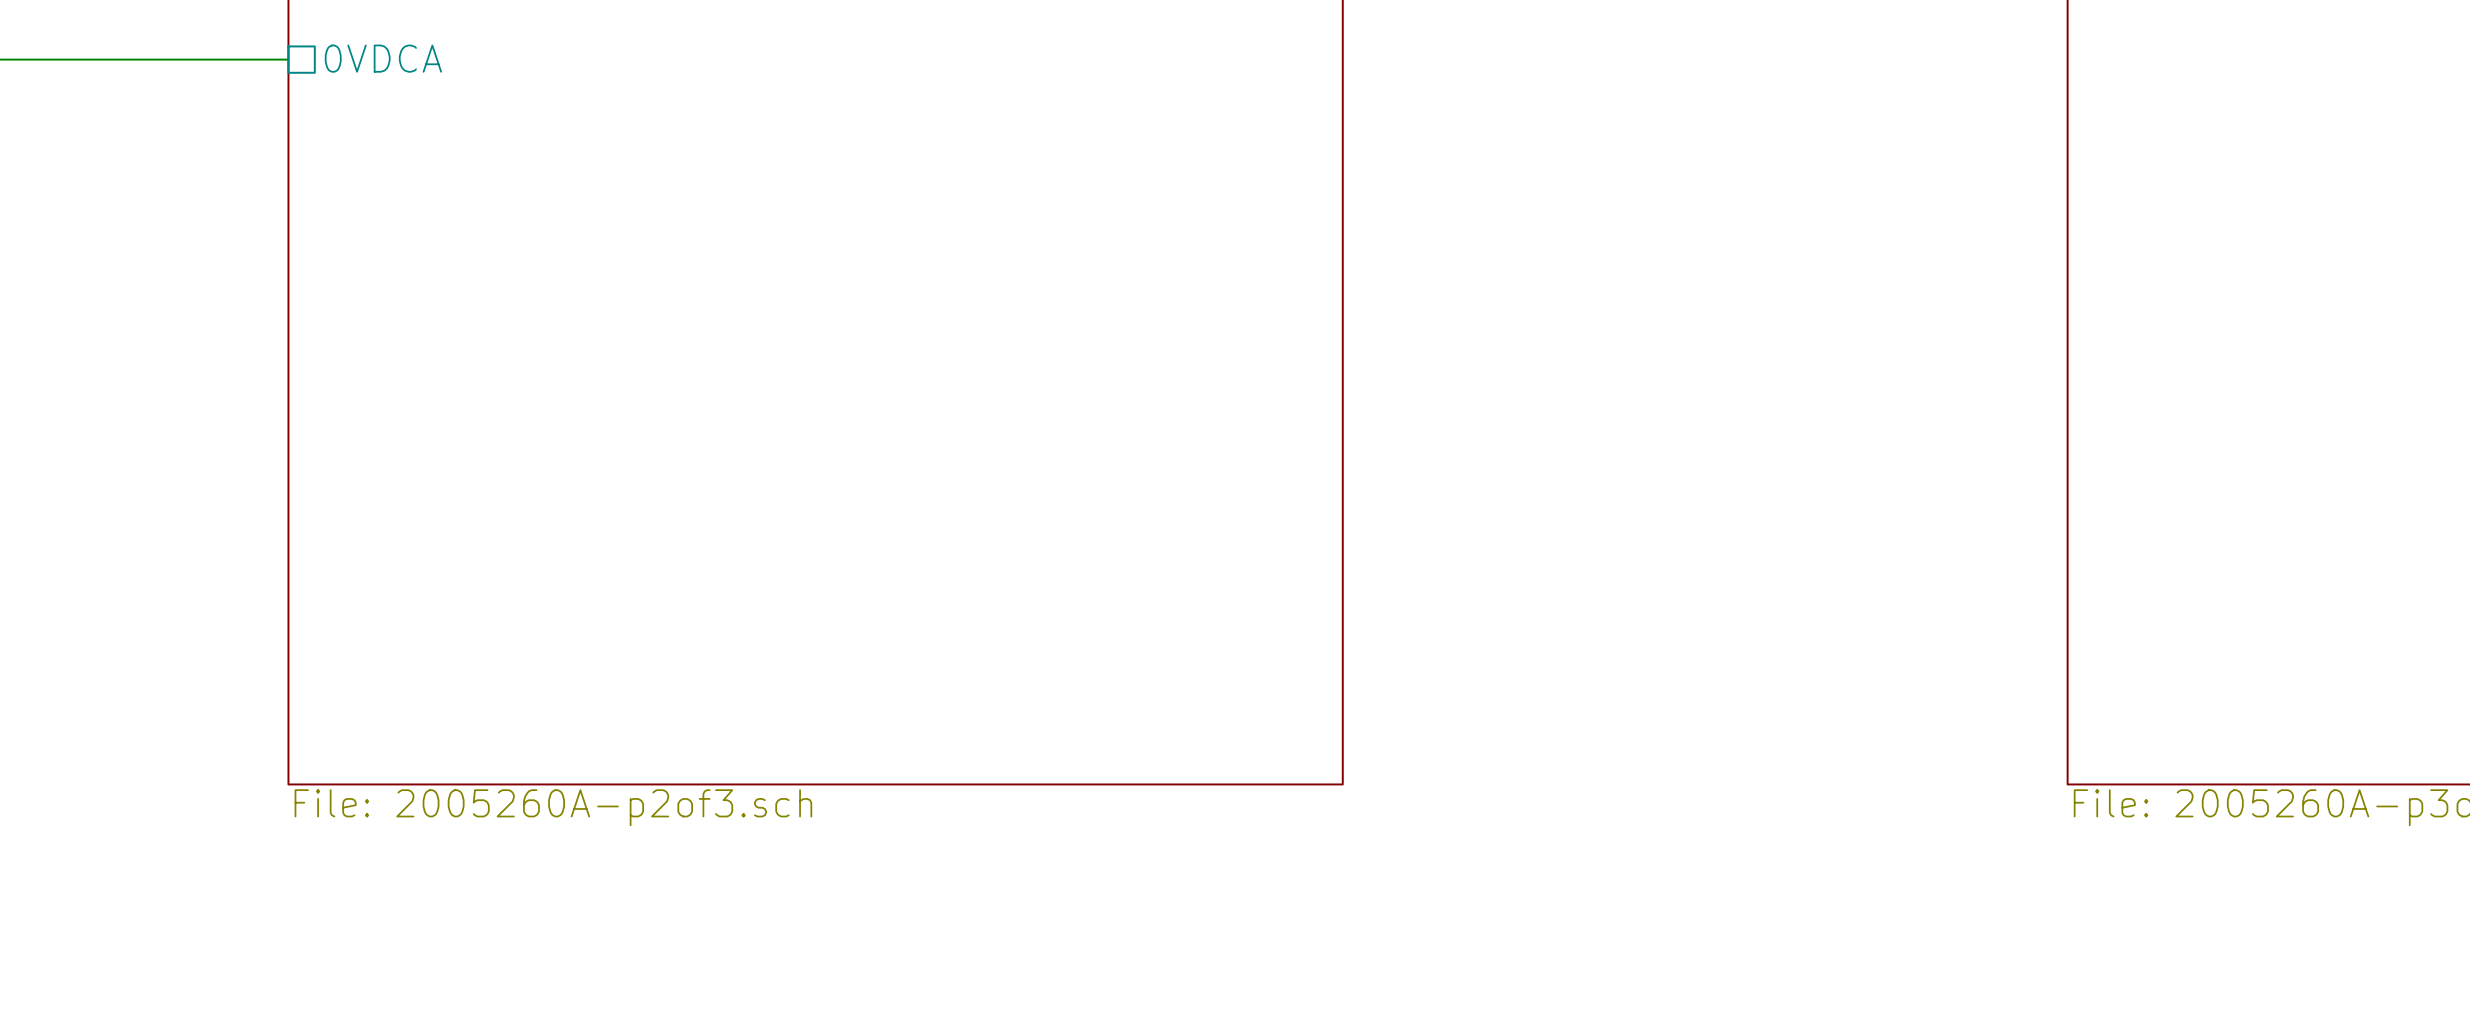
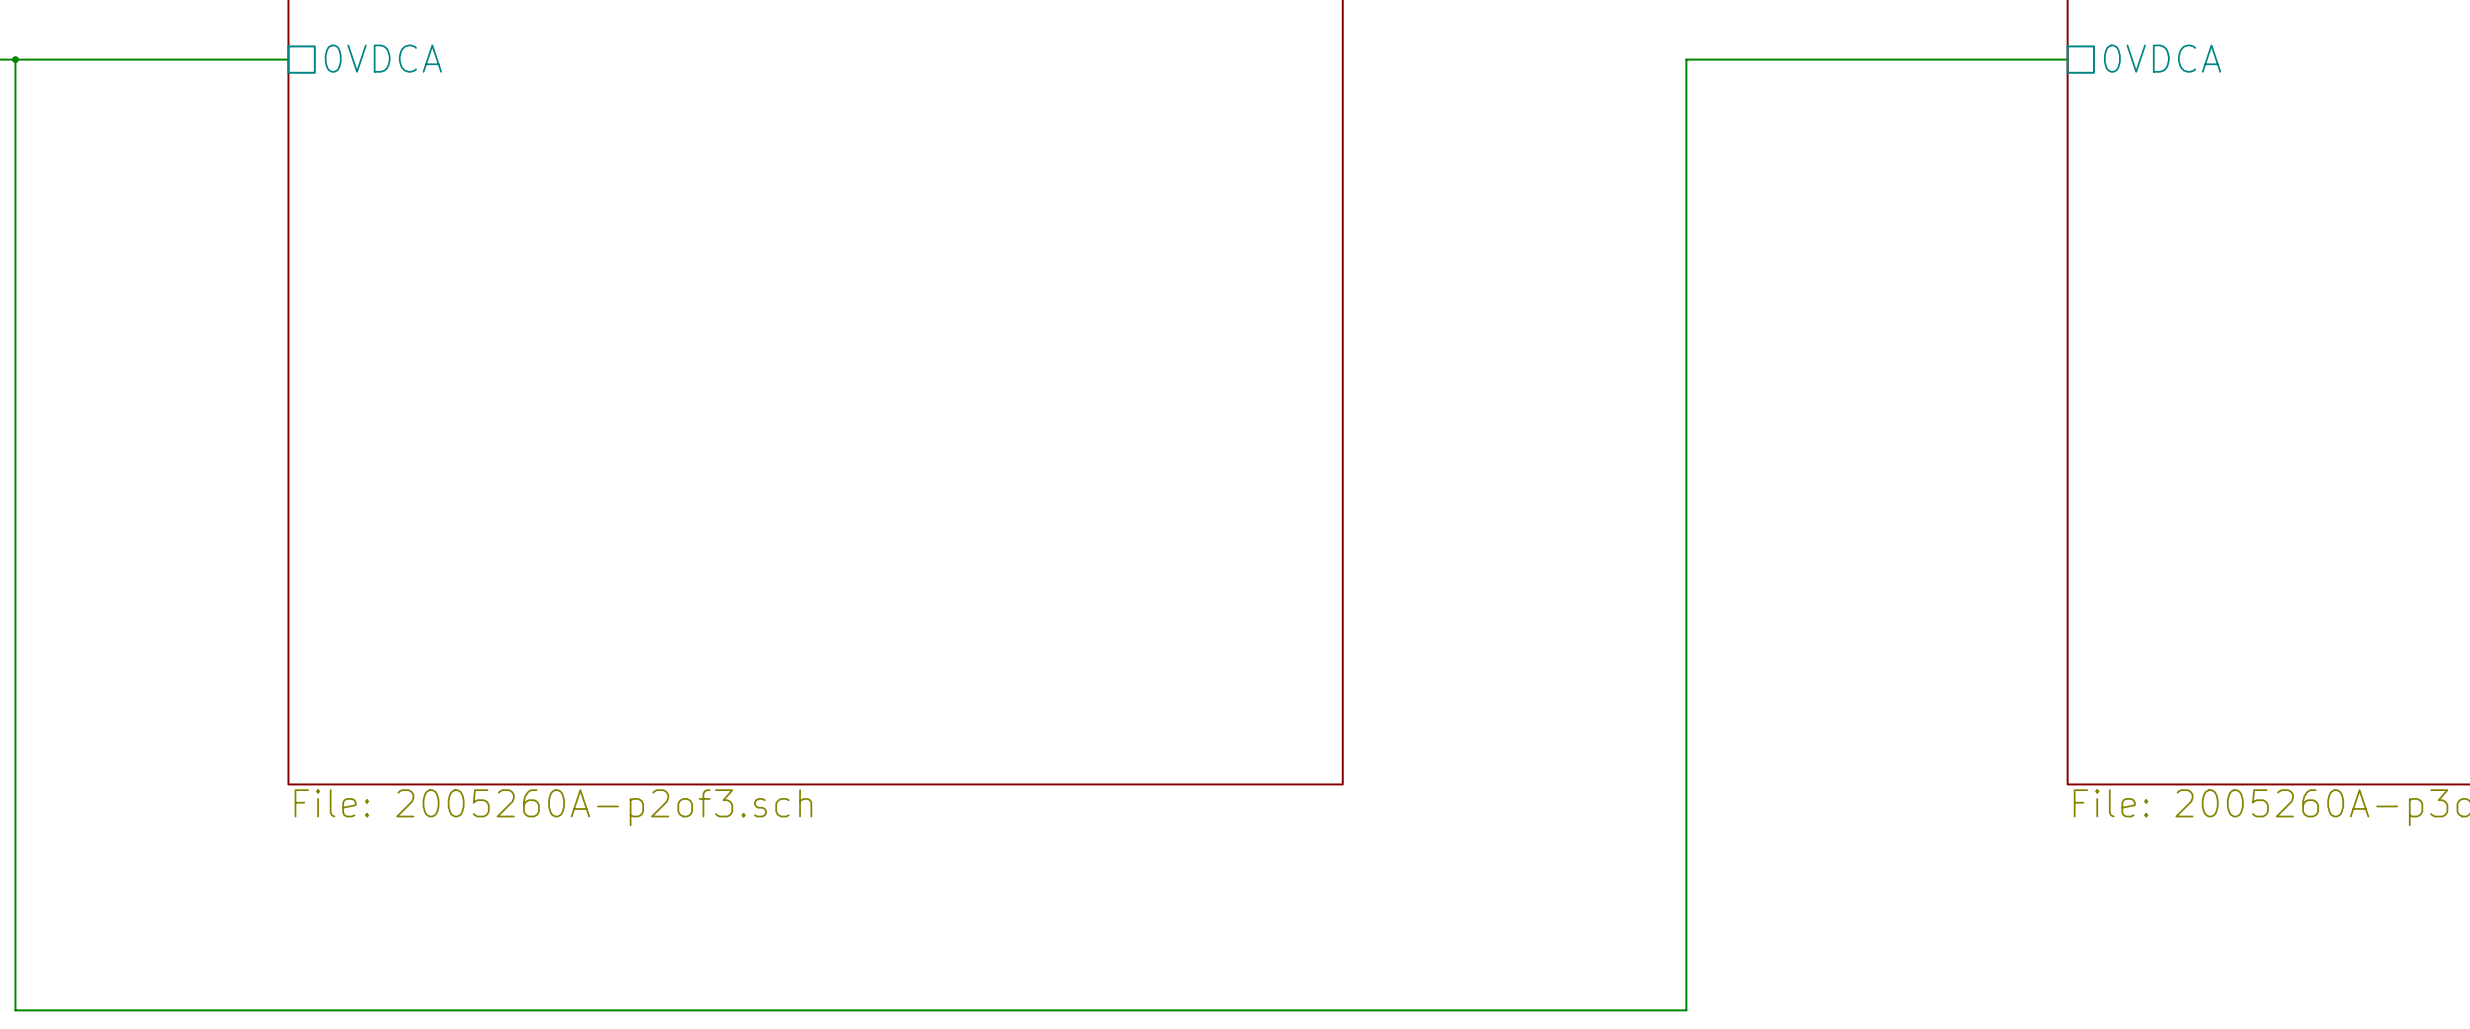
sheet pin: none -> 0VDCA (2162, 58)
wire: none -> (15, 59) (15, 1010) (1686, 1010) (1686, 59) (2067, 59)
junction: none -> (15, 59)

